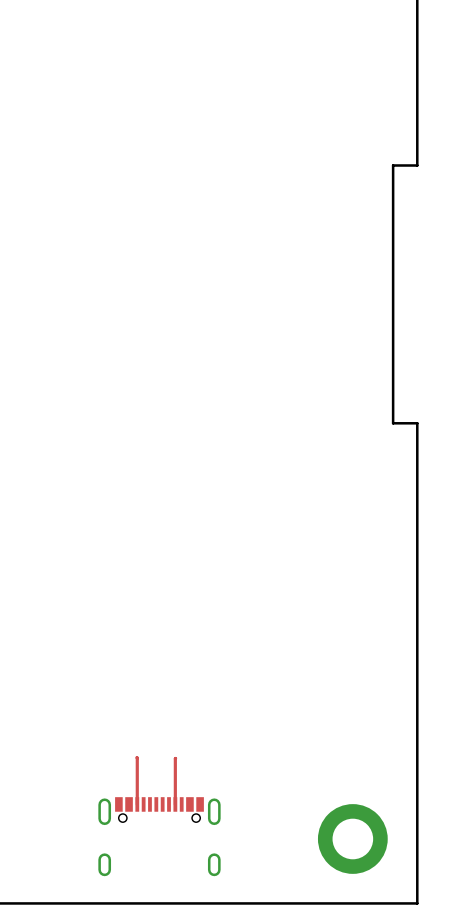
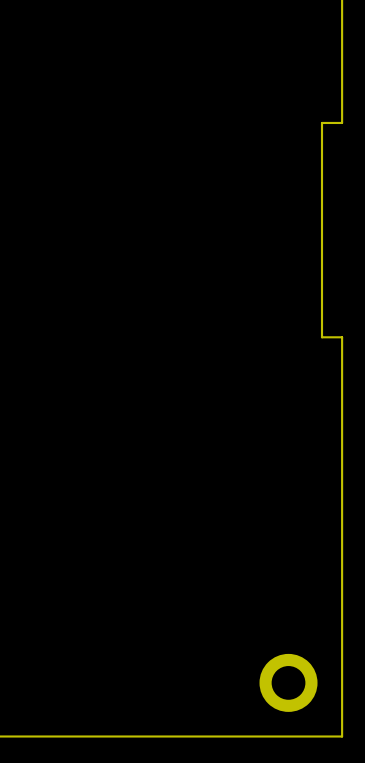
top track: (136, 757) (137, 804) -> none
top track: (175, 758) (175, 804) -> none
part: (159, 836) -> none

